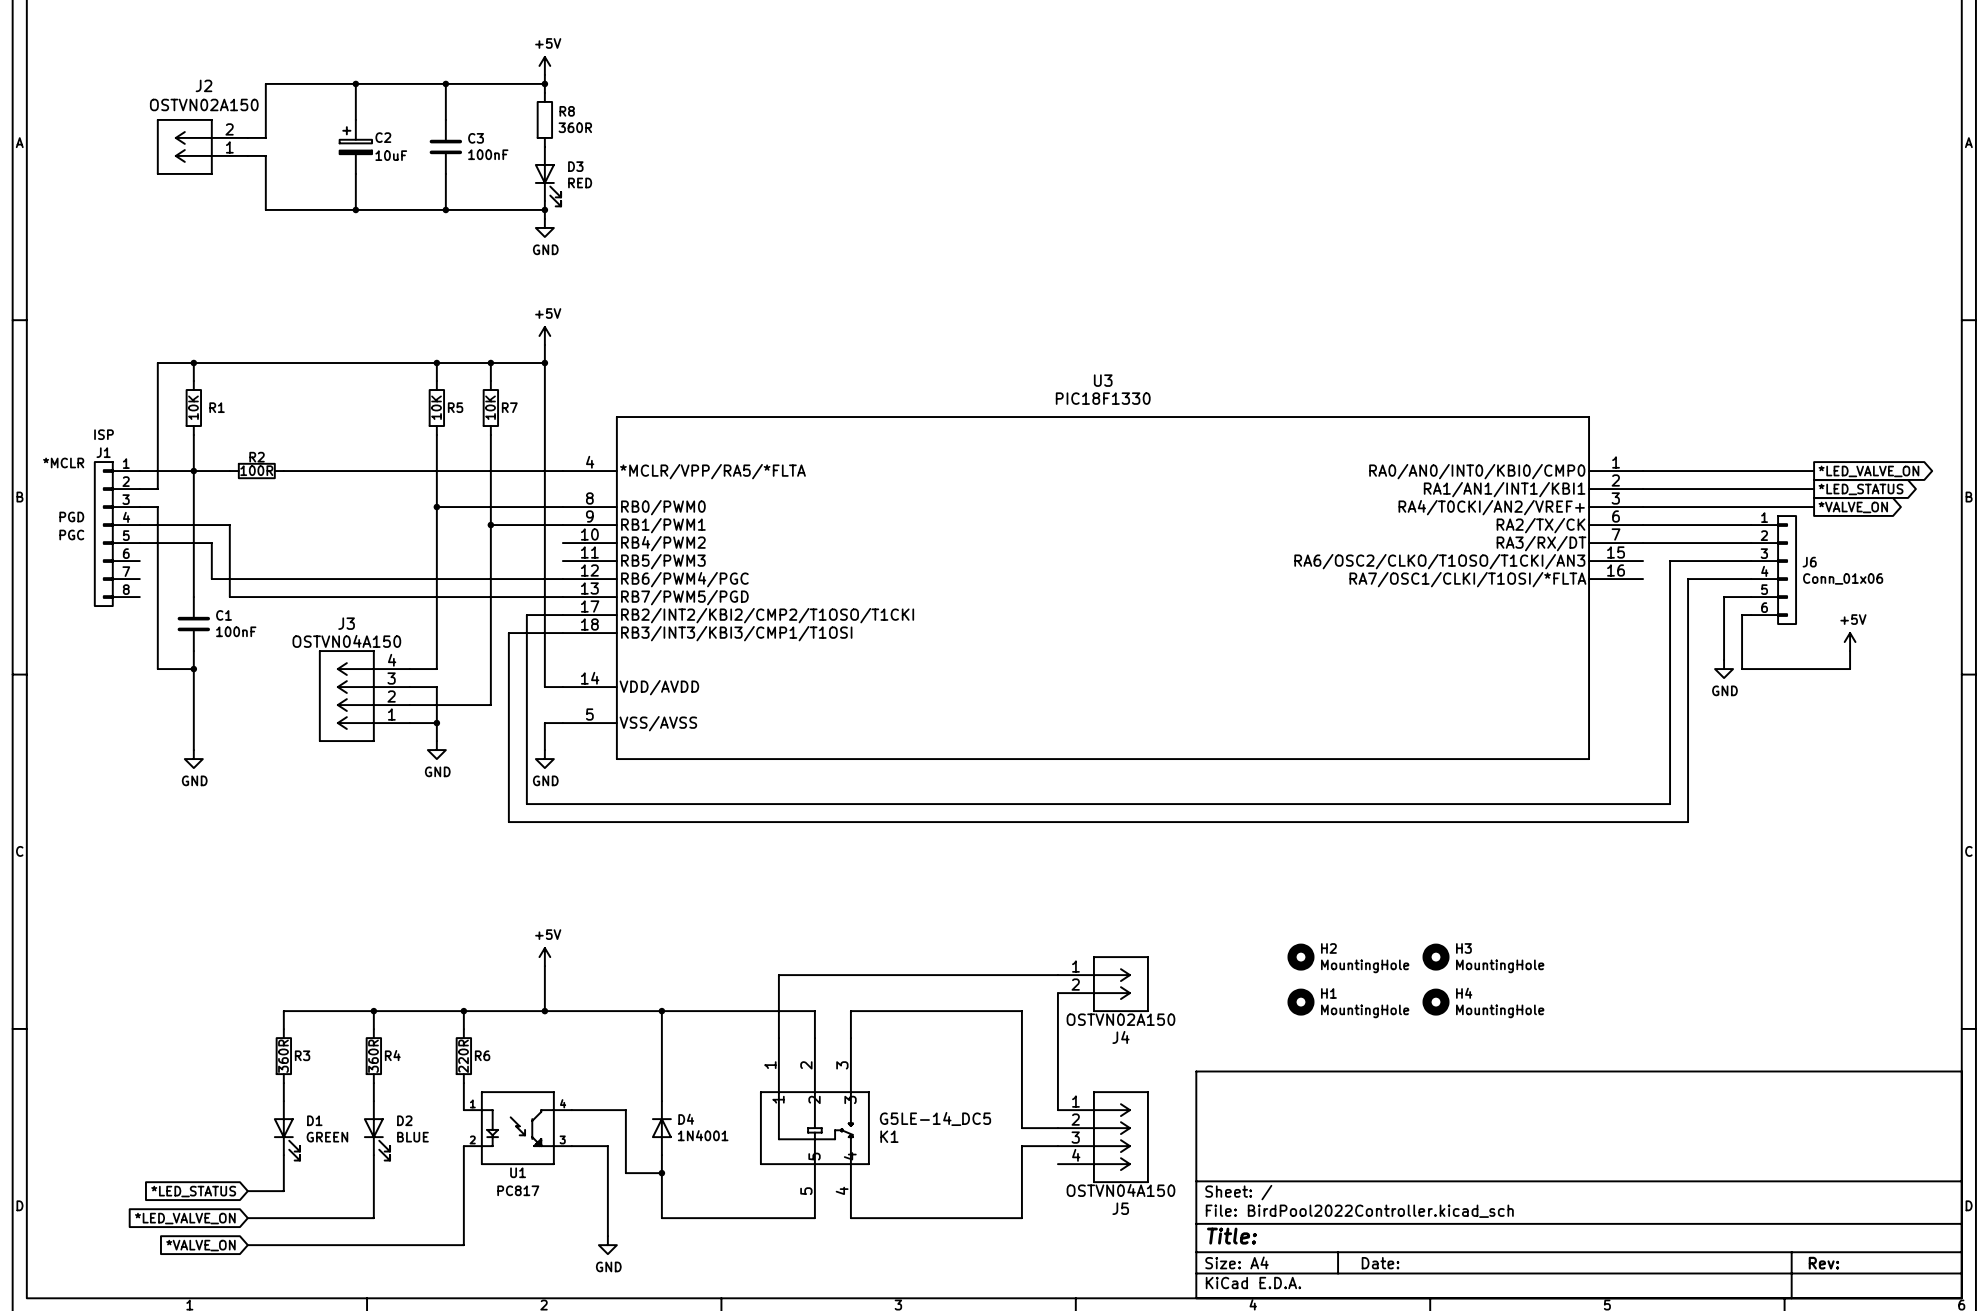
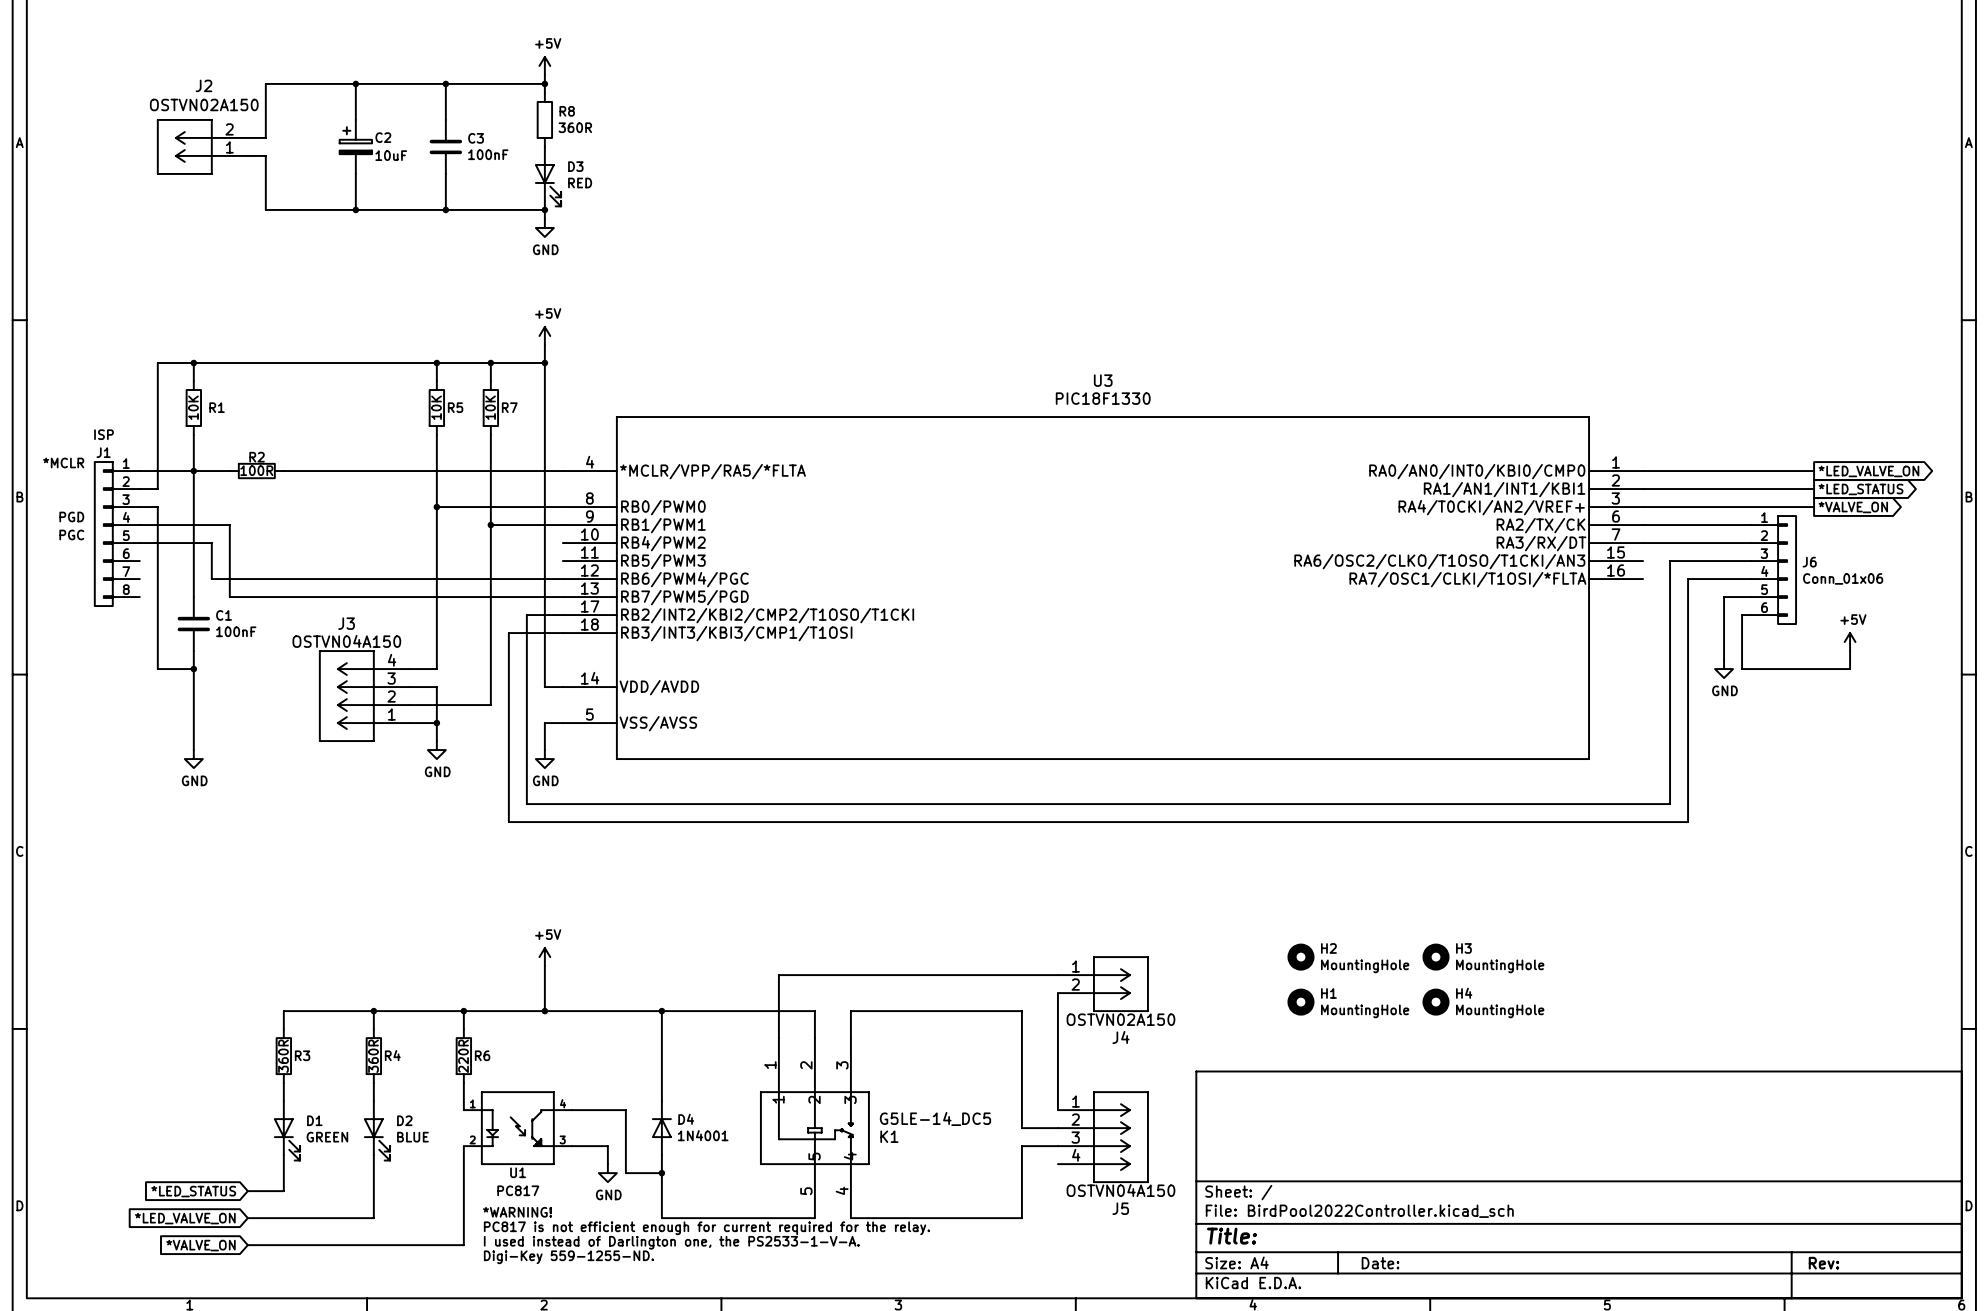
wire: (607, 1164) (607, 1236) -> none
text: none -> *WARNING! (517, 1212)
text: none -> PC817 is not efficient enough for current required for the relay. (706, 1228)
text: none -> I used instead of Darlington one, the PS2533-1-V-A. (671, 1242)
power symbol position: GND (607, 1245) -> GND (607, 1173)
text: none -> Digi-Key 559-1255-ND. (568, 1257)

